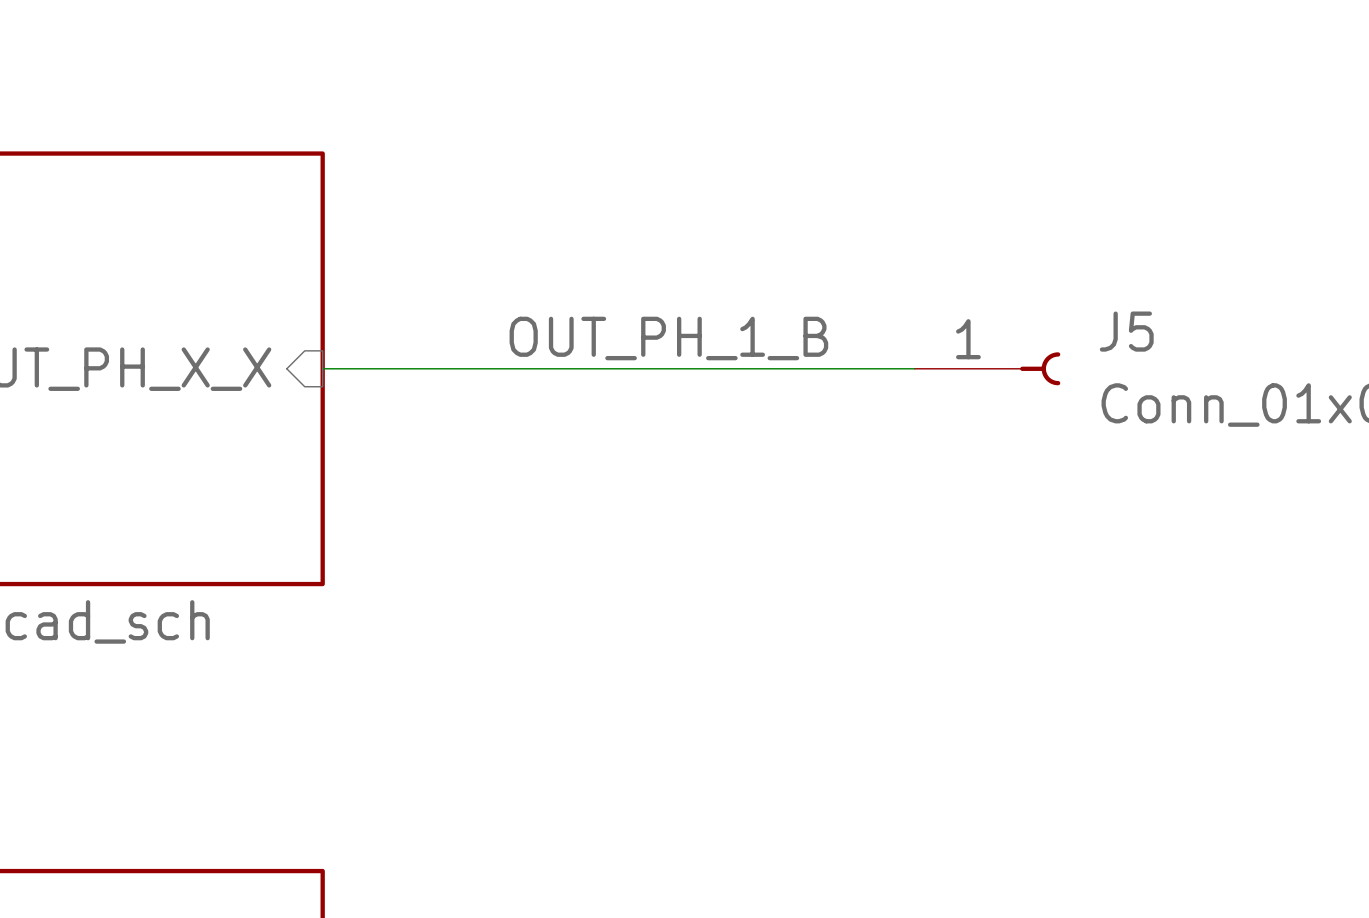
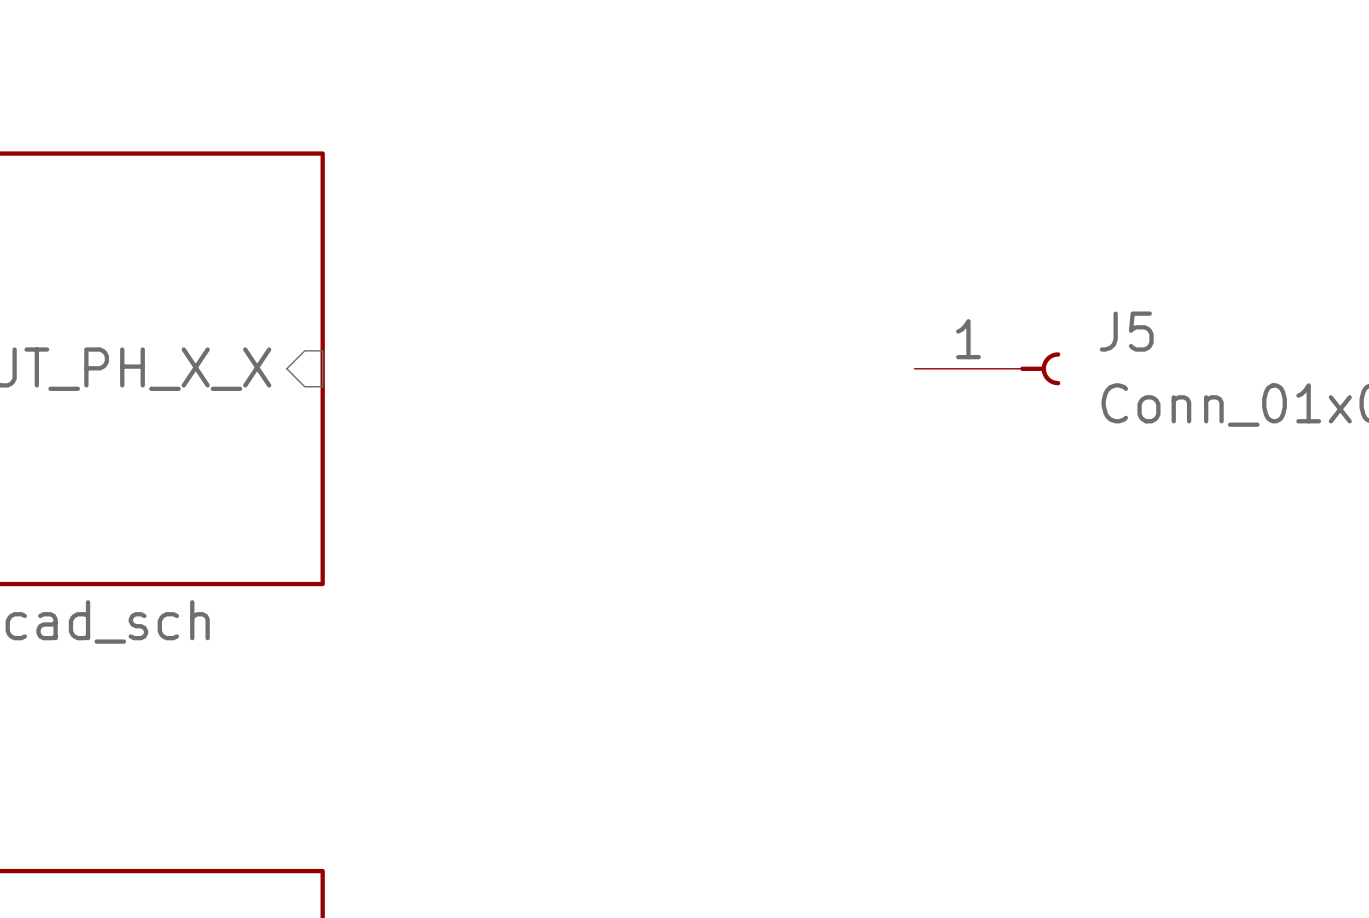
label: OUT_PH_1_B (668, 338) -> none
wire: (322, 368) (914, 368) -> none

